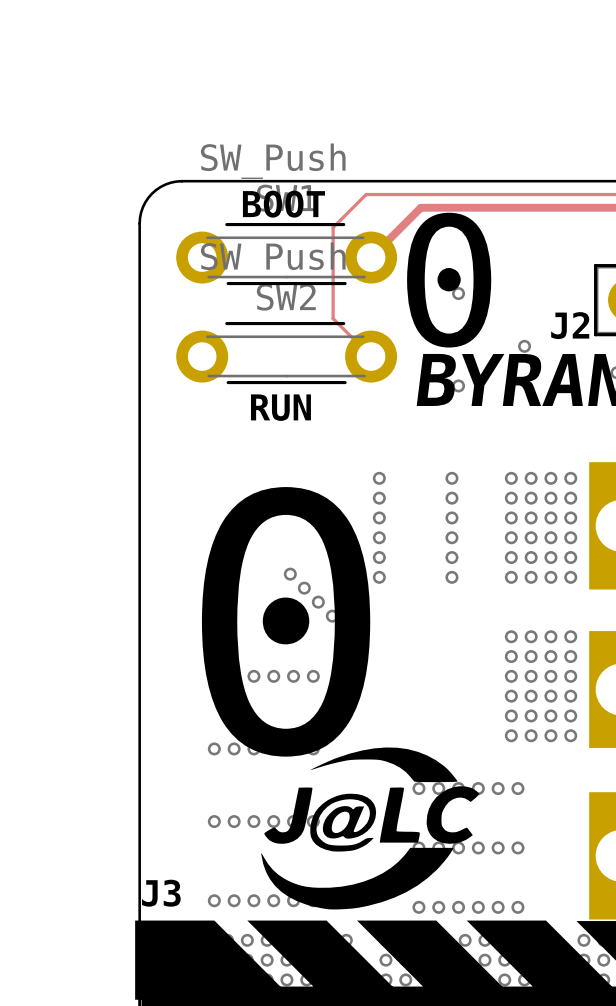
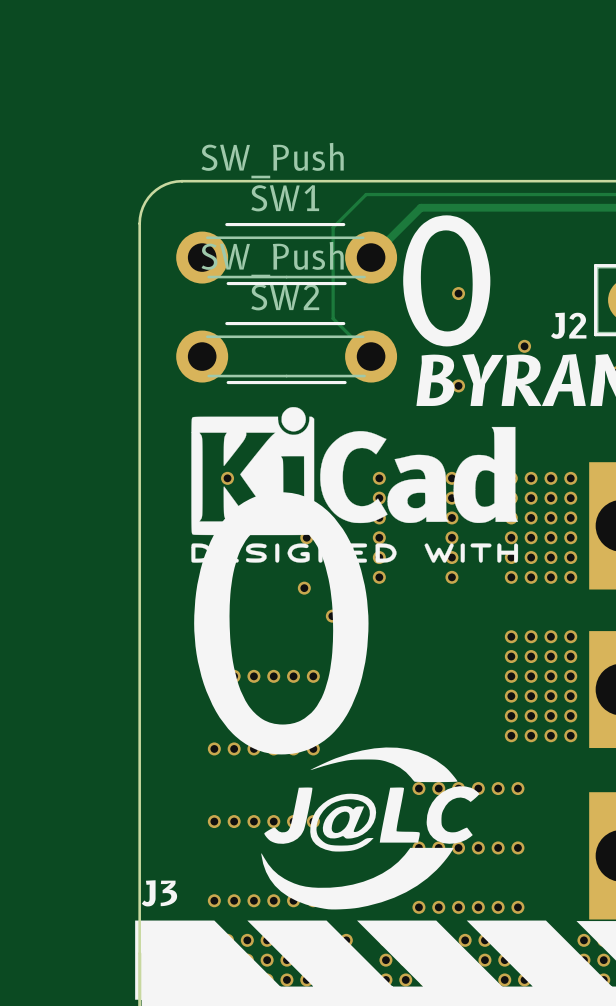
text: BOOT (283, 204) -> none
drawing: none -> [191, 407, 519, 563]
text: RUN (280, 407) -> none
via: none -> (227, 478)
via: none -> (306, 537)
via: (290, 574) -> none
via: (318, 602) -> none

